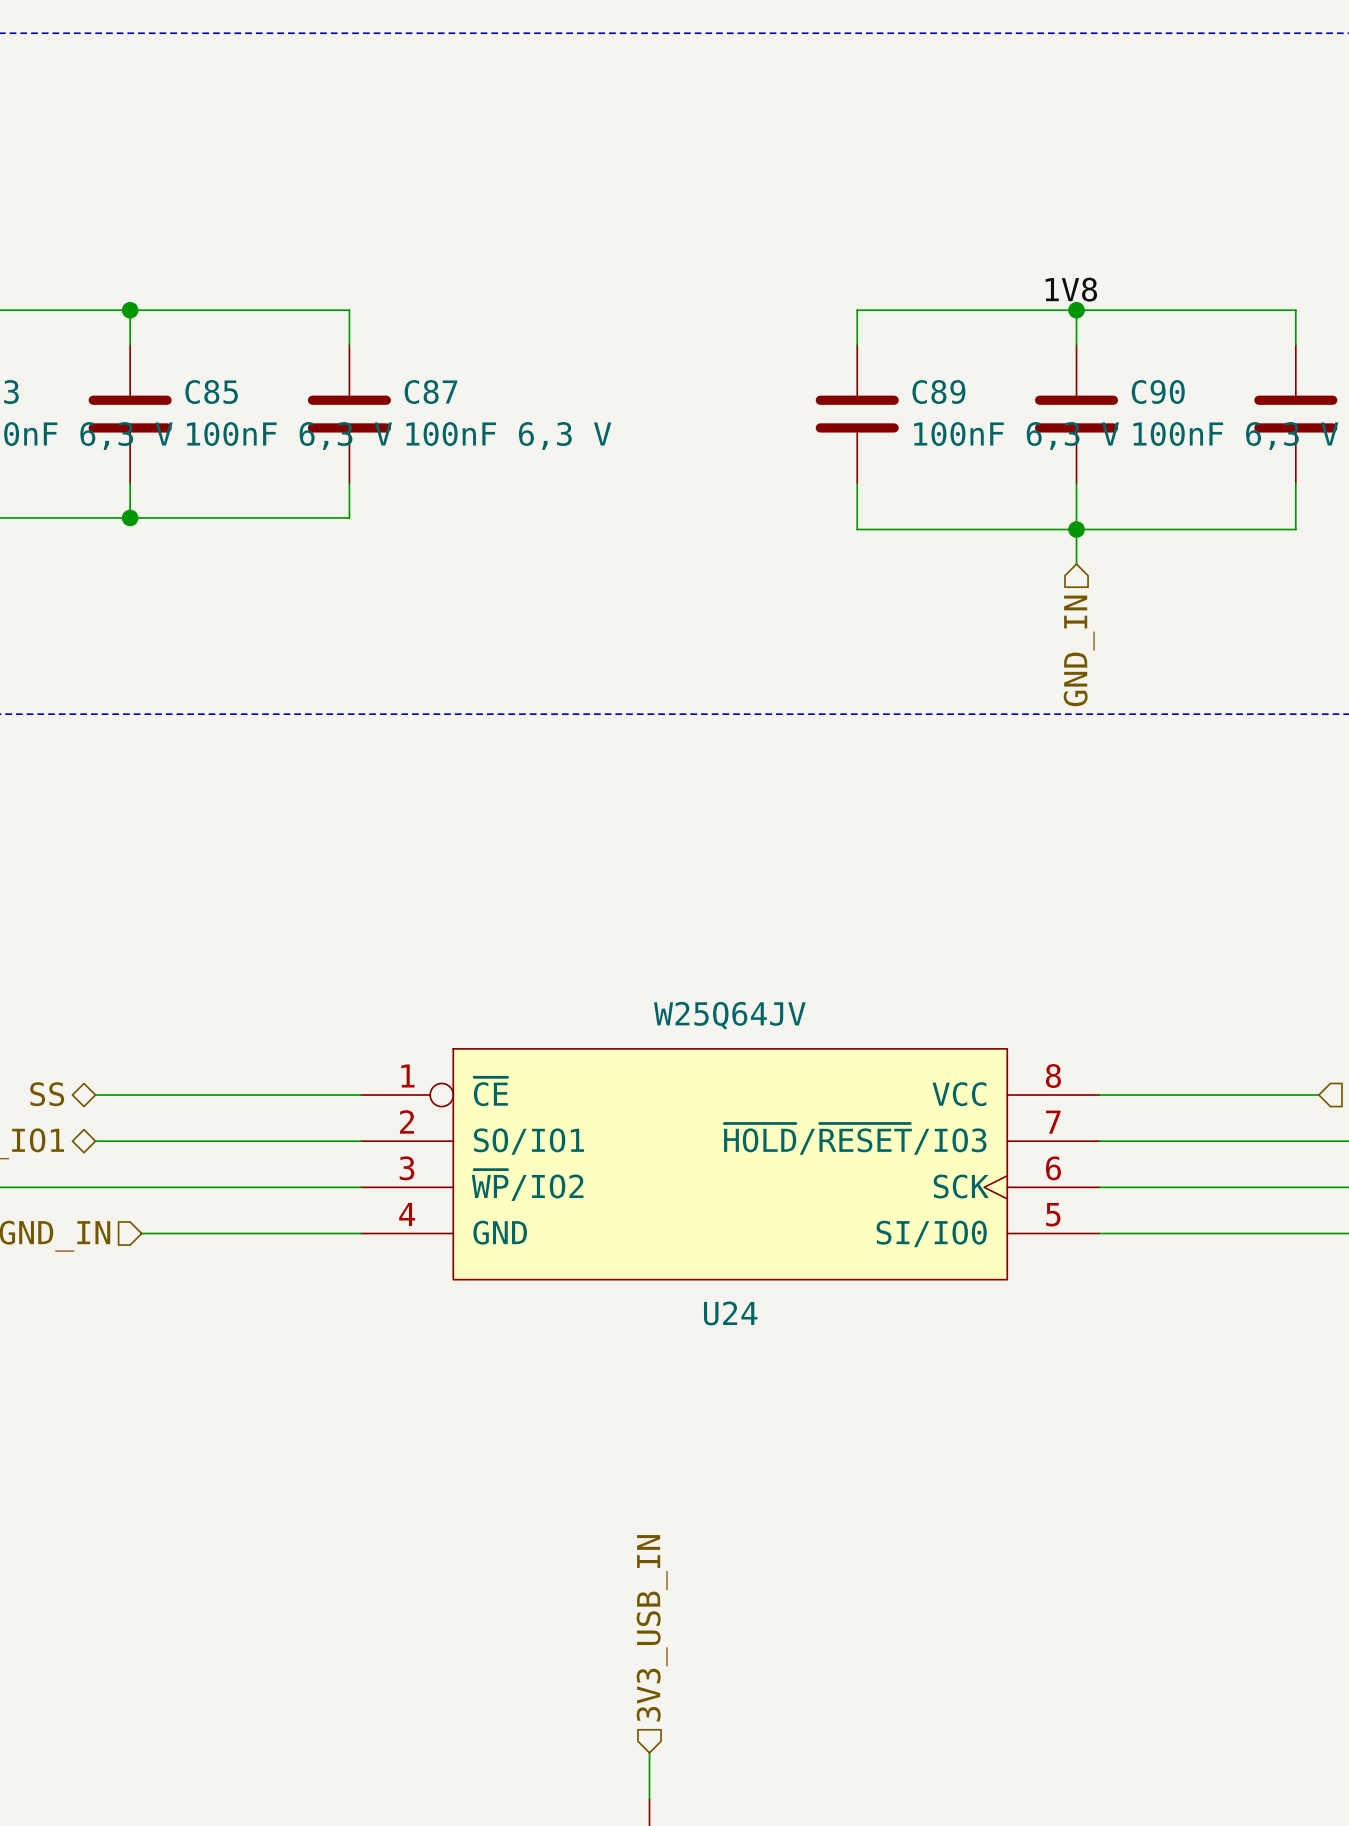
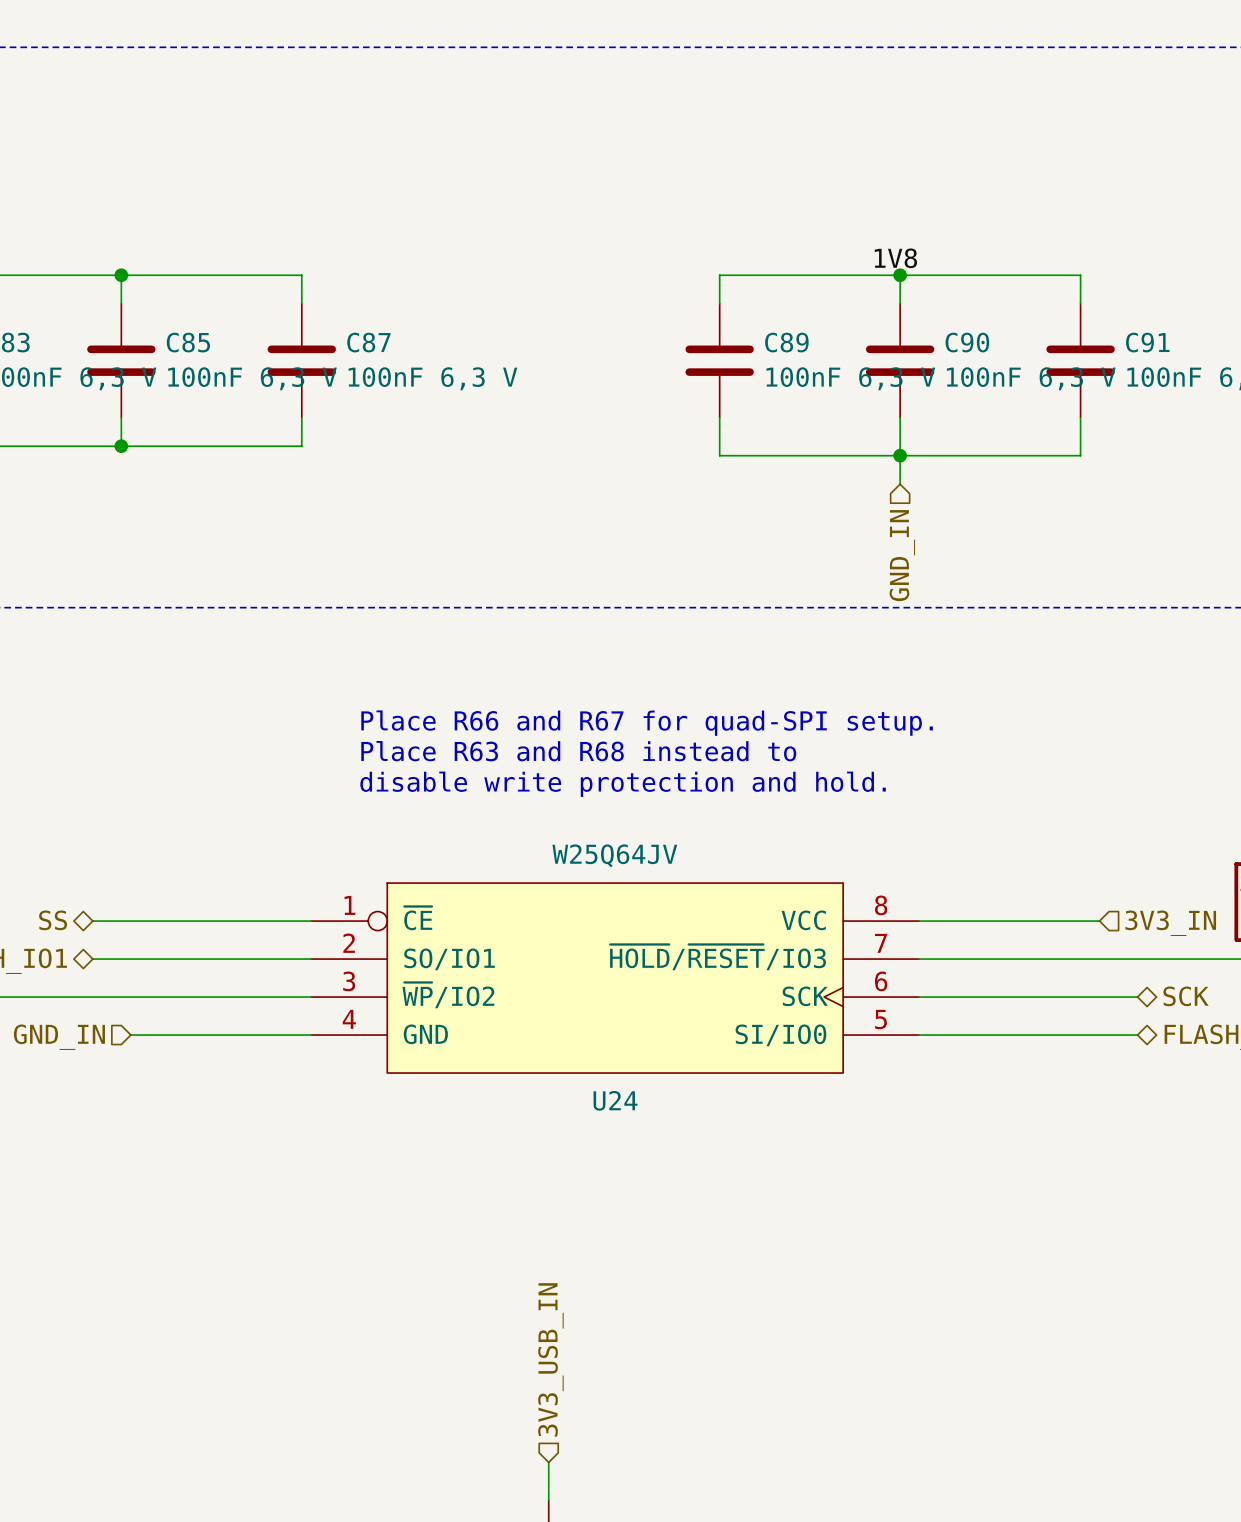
text: none -> Place R66 and R67 for quad-SPI setup. (647, 723)
text: none -> Place R63 and R68 instead to (578, 751)
text: none -> disable write protection and hold. (623, 784)

